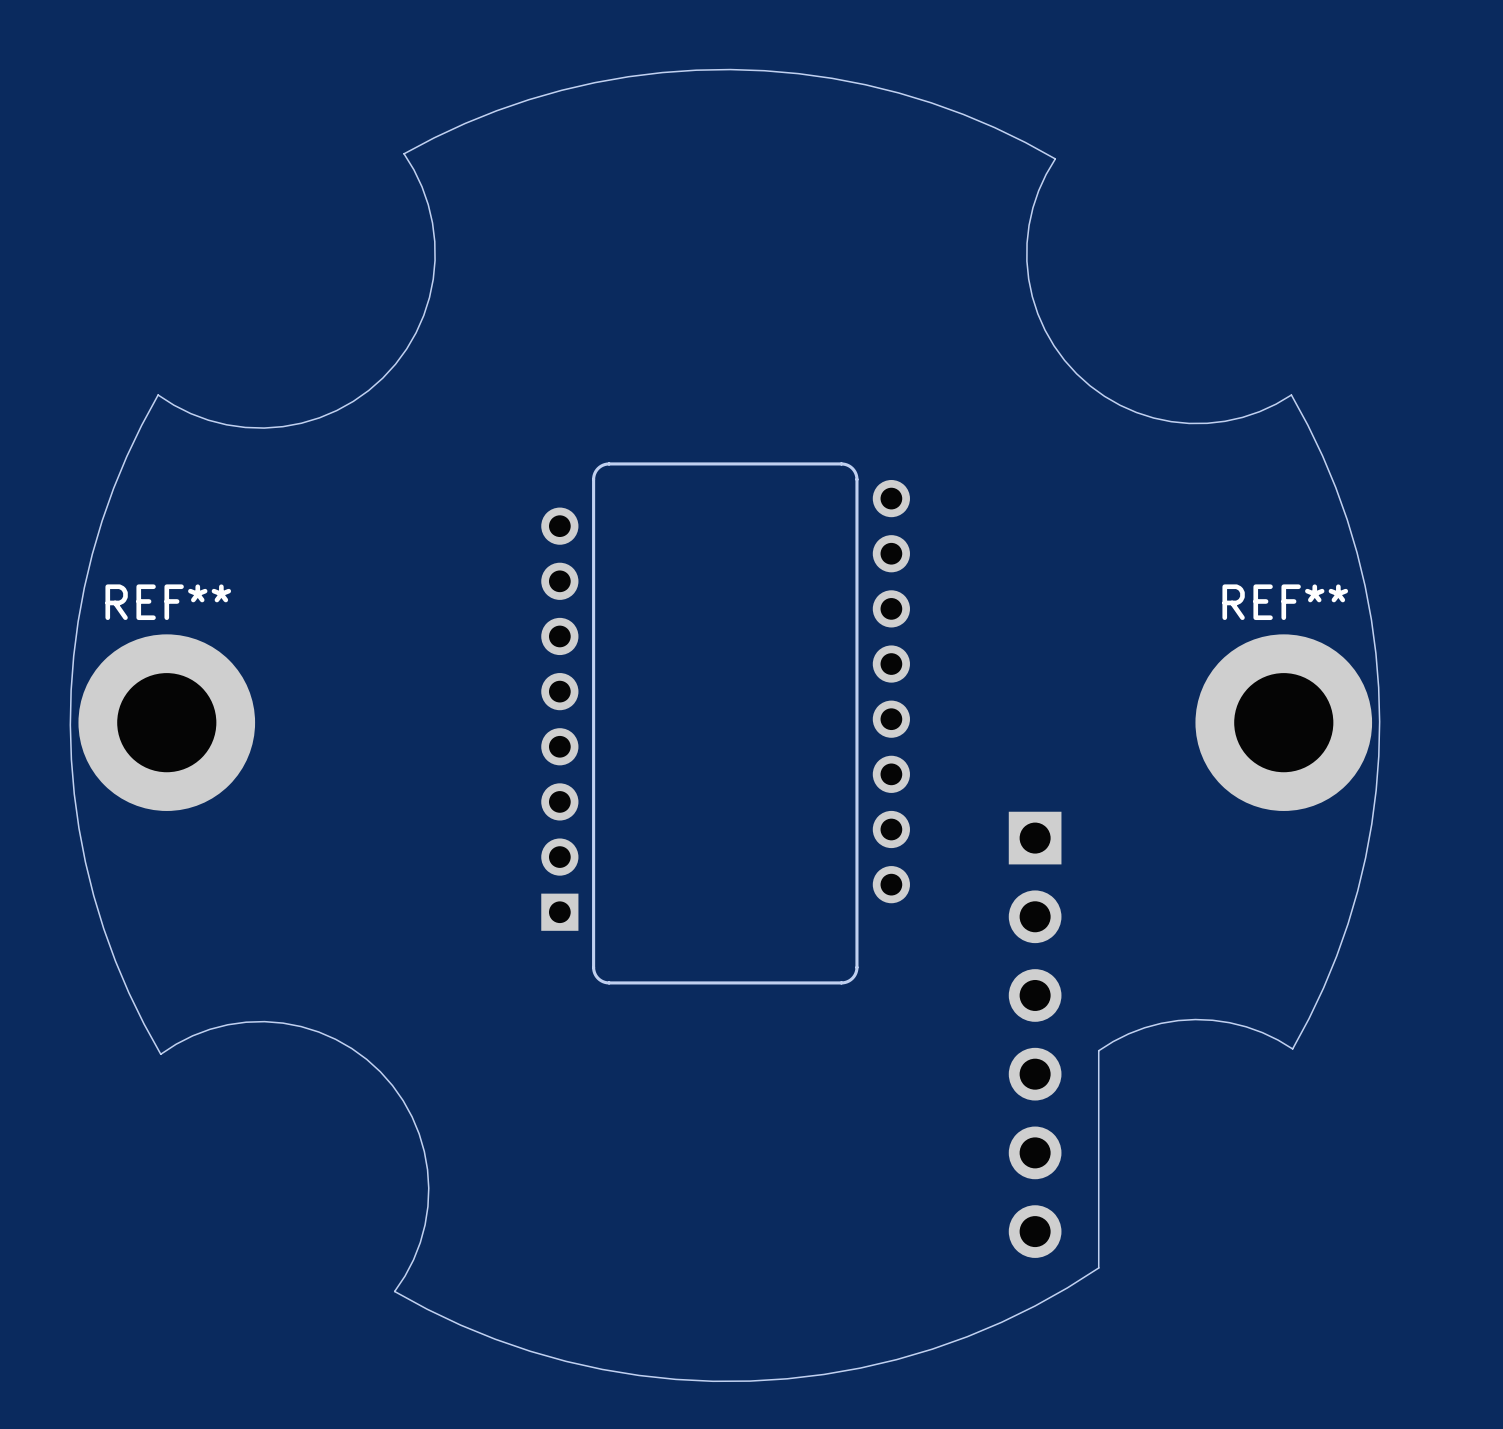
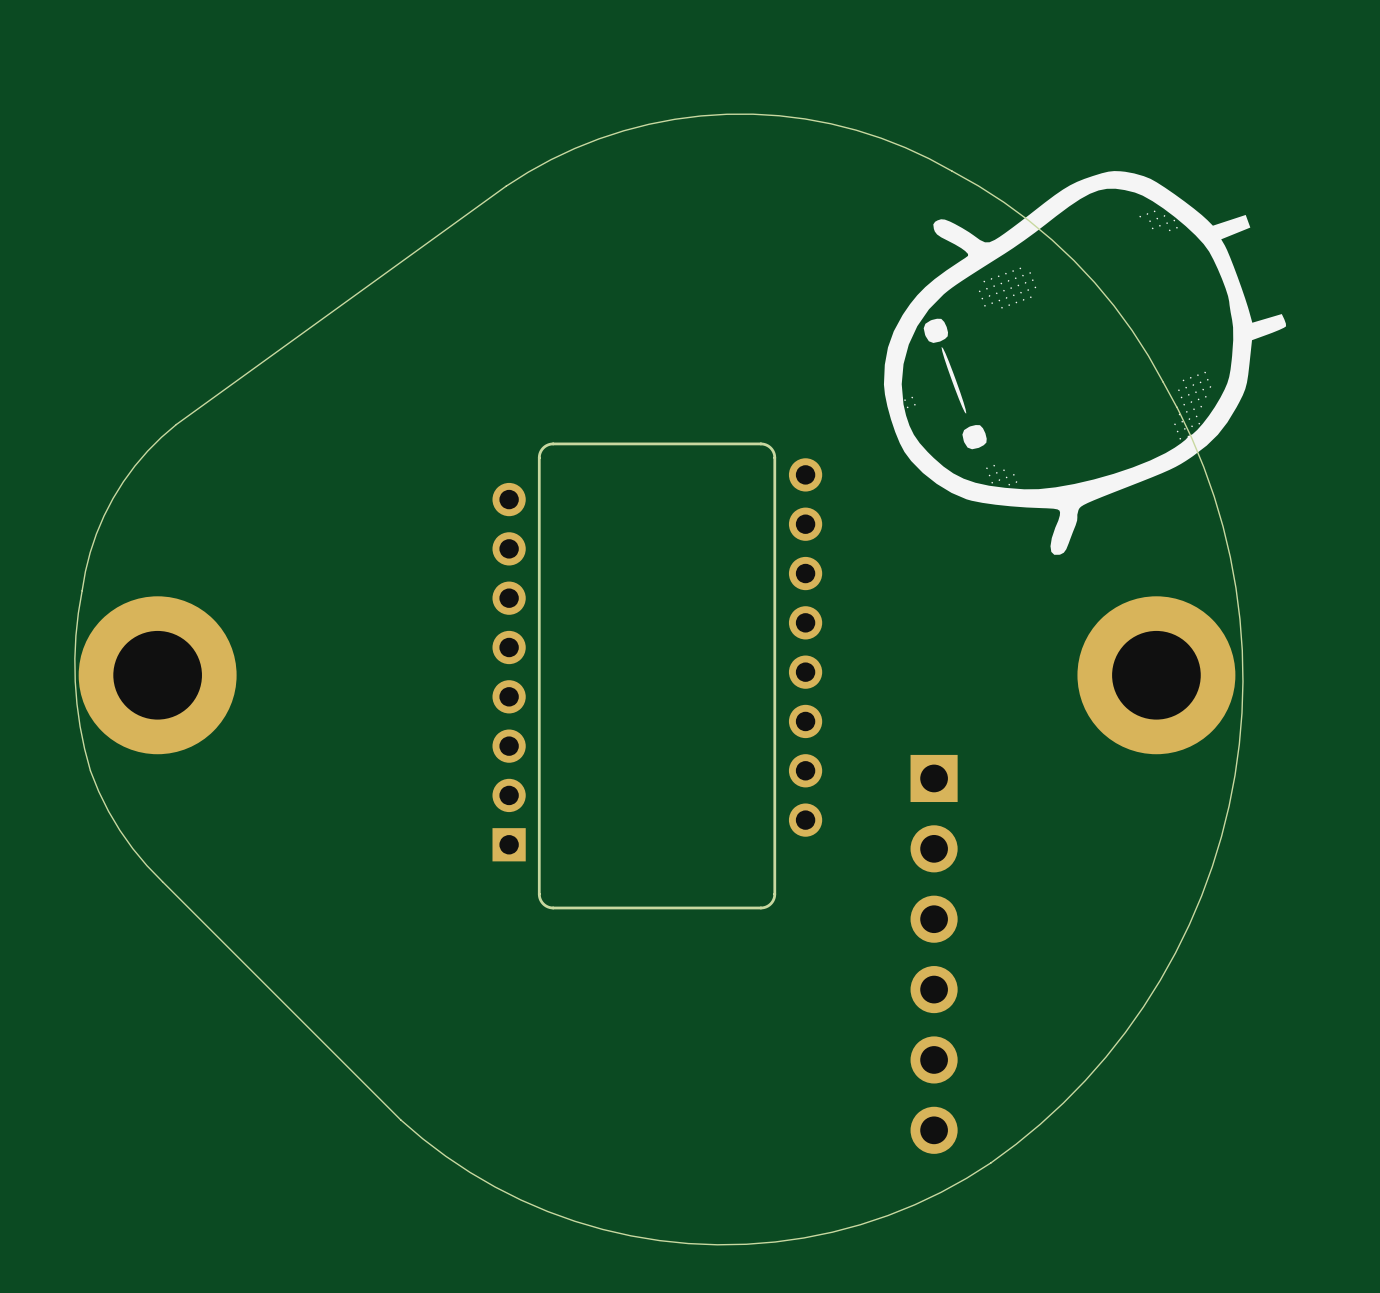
board edge: (404, 153) (434, 137) (465, 123) (528, 99) (594, 82) (662, 72) (696, 70) (764, 70) (832, 78) (898, 92) (963, 114) (994, 127) (1055, 158) (1038, 190) (1029, 225) (1026, 261) (1028, 279) (1037, 313) (1054, 345) (1064, 360) (1089, 385) (1104, 396) (1136, 412) (1171, 421) (1189, 423) (1225, 421) (1242, 417) (1275, 404) (1291, 395) (1307, 425) (1335, 487) (1357, 552) (1371, 619) (1378, 687) (1378, 756) (1371, 824) (1357, 891) (1336, 956) (1308, 1018) (1292, 1048) (1262, 1032) (1246, 1026) (1229, 1022) (1195, 1019) (1178, 1020) (1144, 1027) (1113, 1041) (1098, 1050) (1098, 1267) (1067, 1287) (1034, 1306) (967, 1336) (896, 1359) (824, 1374) (750, 1381) (675, 1379) (602, 1369) (566, 1361) (530, 1351) (460, 1325) (394, 1291) (413, 1259) (425, 1224) (427, 1206) (427, 1169) (424, 1151) (412, 1116) (392, 1085) (366, 1059) (351, 1048) (318, 1032) (282, 1023) (264, 1021) (227, 1024) (209, 1029) (176, 1044) (160, 1054) (128, 992) (103, 928) (85, 862) (74, 793) (70, 725) (73, 656) (78, 621) (92, 554) (113, 488) (141, 425) (158, 395) (190, 413) (226, 424) (264, 428) (282, 426) (301, 423) (336, 410) (368, 390) (395, 364) (406, 349) (423, 315) (433, 279) (435, 260) (432, 222) (428, 204) (413, 169) (404, 153) -> (952, 171) (905, 147) (856, 130) (830, 123) (779, 115) (726, 114) (674, 119) (623, 130) (574, 148) (528, 172) (506, 186) (176, 424) (161, 437) (134, 466) (113, 498) (96, 533) (85, 571) (78, 613) (74, 658) (76, 704) (90, 770) (108, 811) (119, 830) (146, 865) (400, 1119) (422, 1138) (470, 1172) (495, 1186) (547, 1211) (602, 1229) (659, 1240) (688, 1243) (746, 1244) (775, 1241) (832, 1232) (887, 1215) (941, 1192) (990, 1162) (1016, 1144) (1063, 1103) (1106, 1057) (1125, 1032) (1160, 980) (1189, 924) (1201, 895) (1221, 836) (1229, 806) (1239, 744) (1241, 713) (1242, 650) (1235, 588) (1223, 526) (1214, 496) (1191, 438) (1178, 409) (1148, 355) (1114, 305) (1073, 260) (1028, 220) (1004, 202) (952, 171)
drawing: none -> [883, 171, 1287, 555]
REF** name: REF** (168, 602) -> none
REF** name: REF** (1285, 602) -> none

